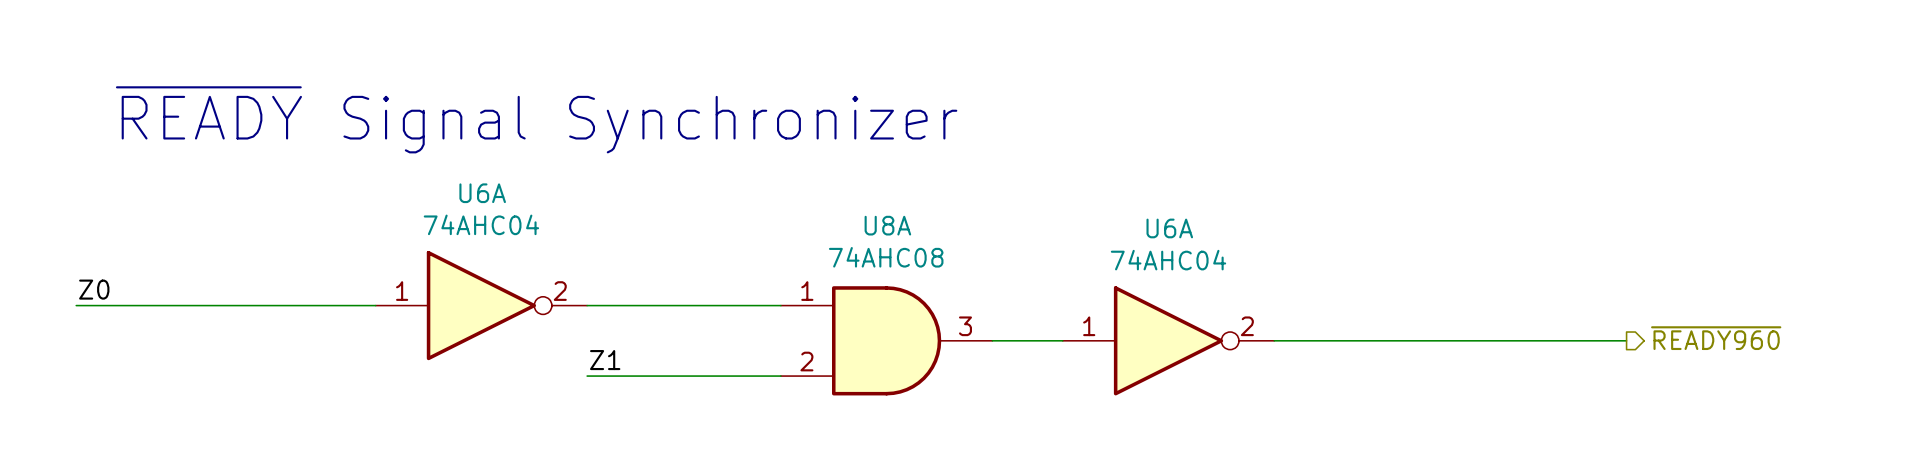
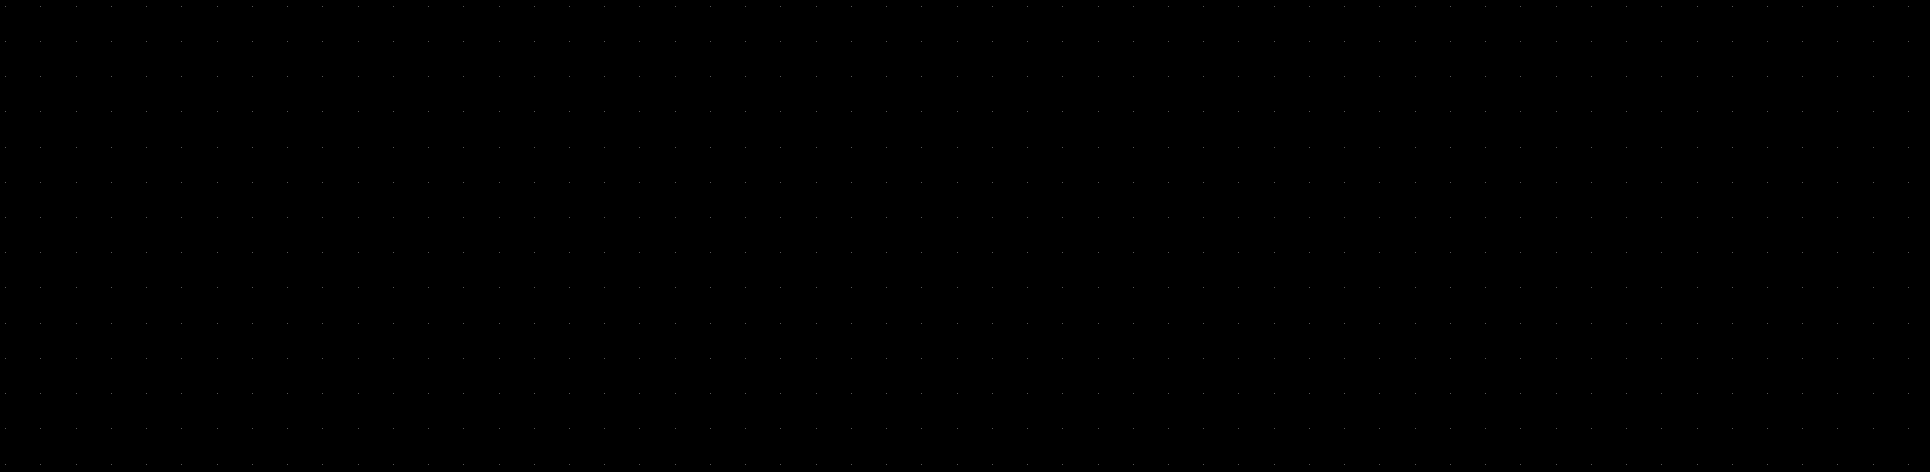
text: ~{READY} Signal Synchronizer (536, 119) -> none
label: Z0 (94, 289) -> none
wire: (76, 305) (375, 305) -> none
U6A: 74AHC04 (481, 305) -> none
wire: (587, 305) (780, 305) -> none
hierarchical label: ~{READY960} (1716, 338) -> none
U8A: 74AHC08 (886, 340) -> none
wire: (992, 340) (1062, 340) -> none
U6A: 74AHC04 (1168, 340) -> none
wire: (1274, 340) (1626, 340) -> none
label: Z1 (605, 360) -> none
wire: (587, 376) (780, 376) -> none

